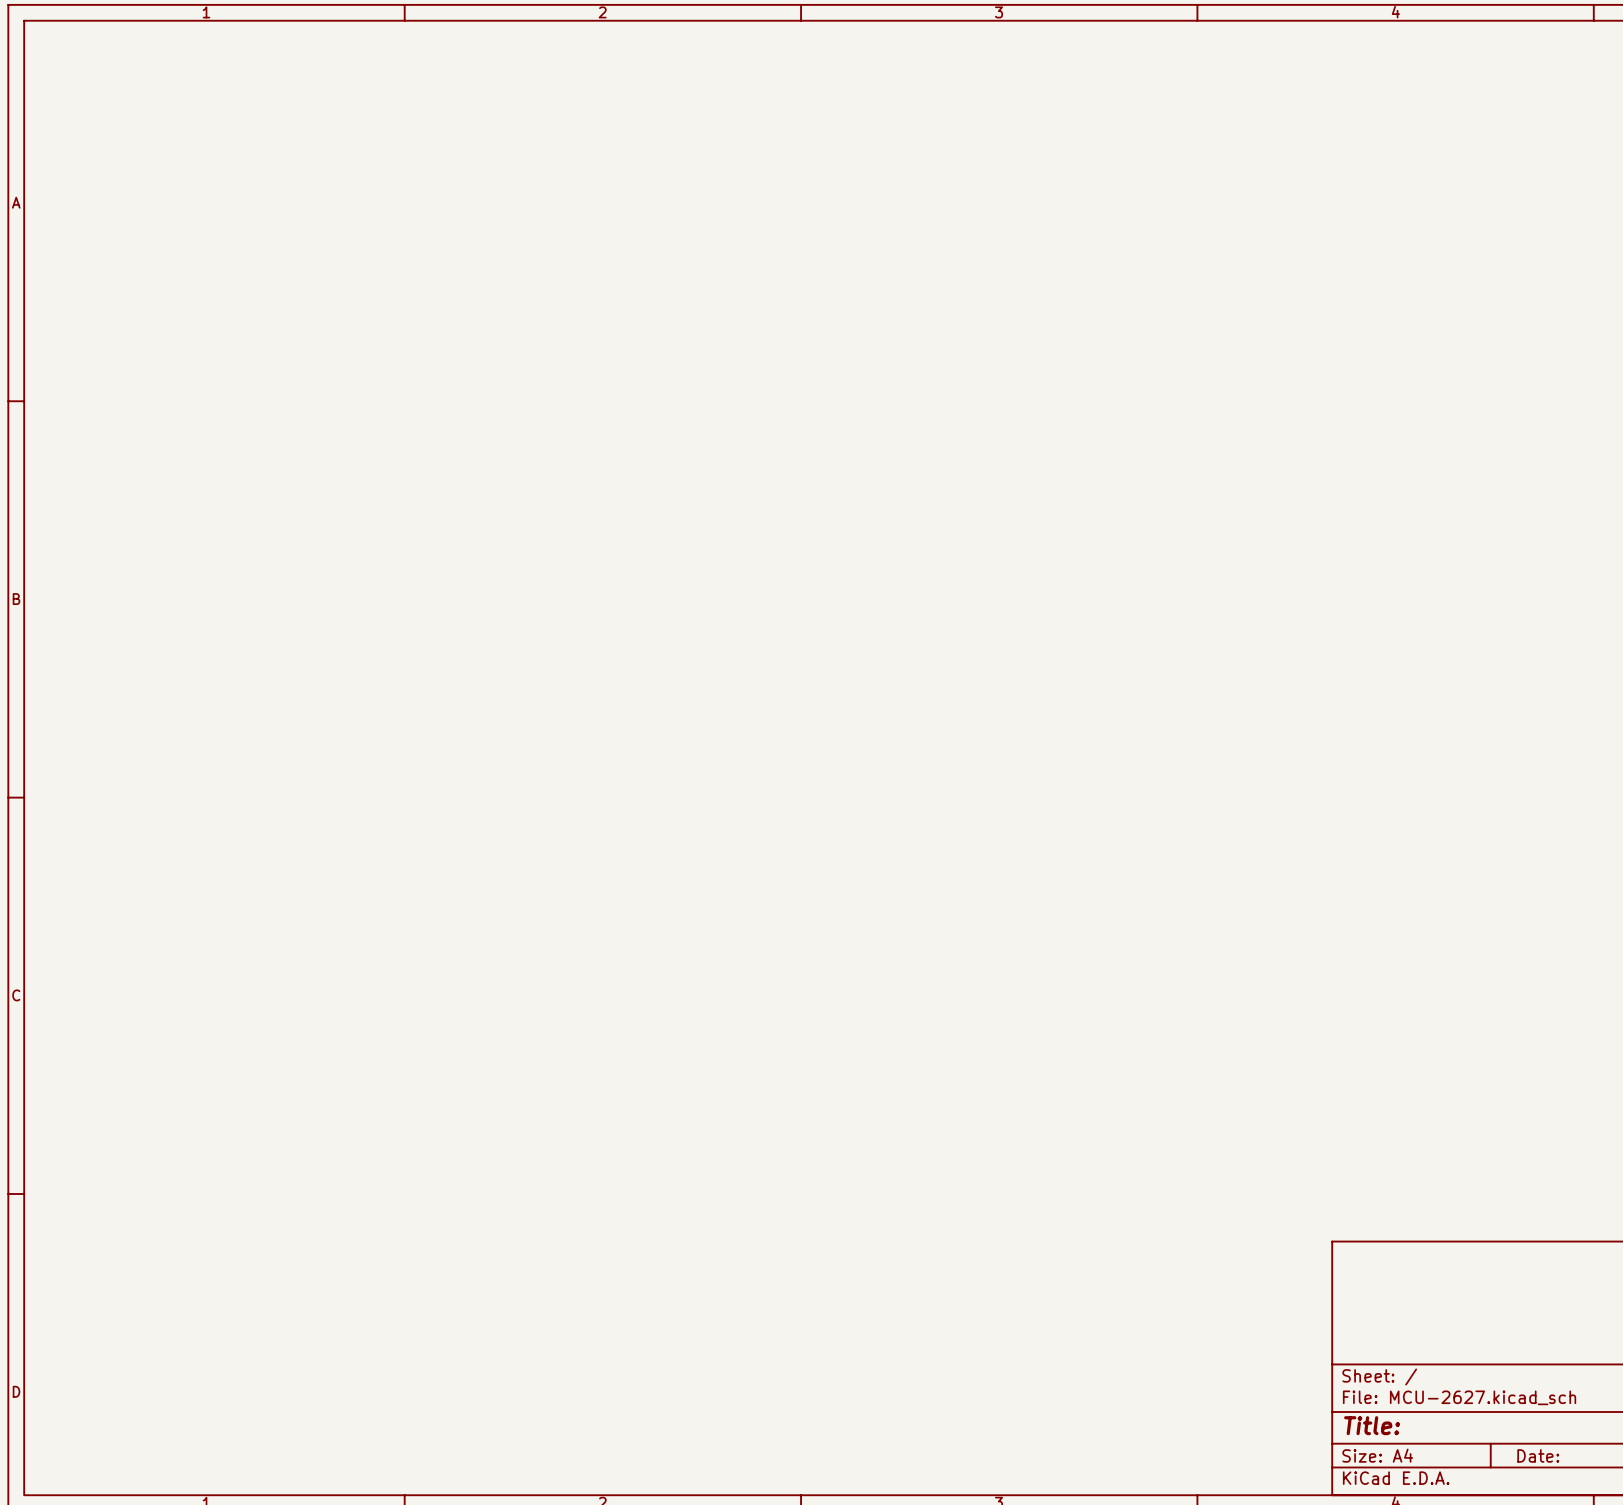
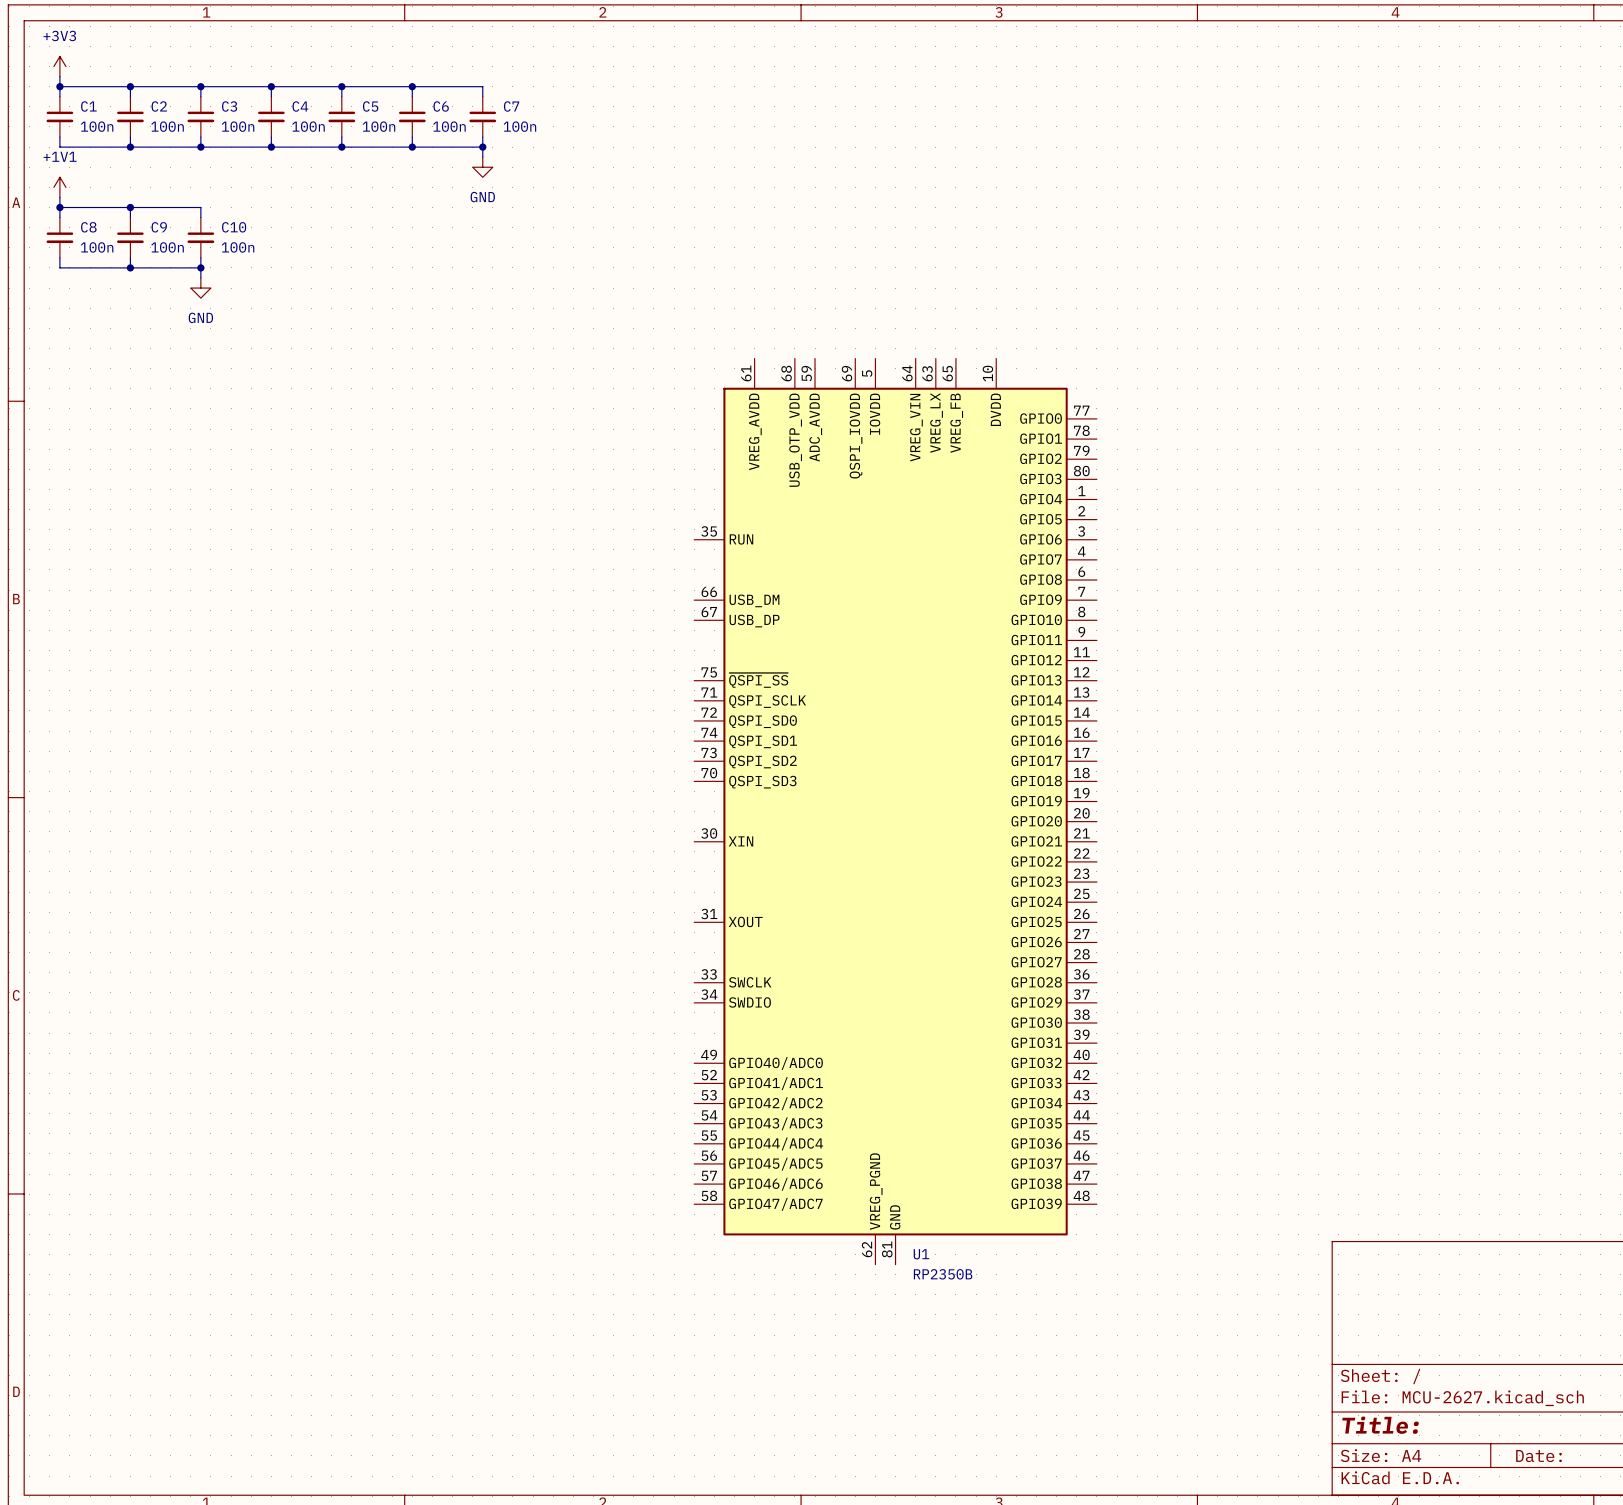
power symbol: none -> +3V3 (59, 66)
wire: none -> (59, 76) (59, 96)
wire: none -> (59, 86) (482, 86) (482, 96)
junction: none -> (59, 86)
wire: none -> (130, 86) (130, 96)
junction: none -> (130, 86)
wire: none -> (200, 86) (200, 96)
junction: none -> (200, 86)
wire: none -> (271, 86) (271, 96)
junction: none -> (271, 86)
wire: none -> (341, 86) (341, 96)
junction: none -> (341, 86)
wire: none -> (412, 86) (412, 96)
junction: none -> (412, 86)
C1: none -> 100n (59, 116)
C2: none -> 100n (130, 116)
C3: none -> 100n (200, 116)
C4: none -> 100n (271, 116)
C5: none -> 100n (341, 116)
C6: none -> 100n (412, 116)
C7: none -> 100n (482, 116)
wire: none -> (59, 137) (59, 147) (482, 147)
wire: none -> (130, 137) (130, 147)
wire: none -> (200, 137) (200, 147)
wire: none -> (271, 137) (271, 147)
wire: none -> (341, 137) (341, 147)
wire: none -> (412, 137) (412, 147)
wire: none -> (482, 137) (482, 157)
junction: none -> (130, 147)
junction: none -> (200, 147)
junction: none -> (271, 147)
junction: none -> (341, 147)
junction: none -> (412, 147)
junction: none -> (482, 147)
power symbol: none -> GND (482, 167)
power symbol: none -> +1V1 (59, 187)
wire: none -> (59, 197) (59, 217)
wire: none -> (59, 207) (200, 207) (200, 217)
junction: none -> (59, 207)
wire: none -> (130, 207) (130, 217)
junction: none -> (130, 207)
C8: none -> 100n (59, 237)
C9: none -> 100n (130, 237)
C10: none -> 100n (200, 237)
wire: none -> (59, 257) (59, 267) (200, 267)
wire: none -> (130, 257) (130, 267)
wire: none -> (200, 257) (200, 277)
junction: none -> (130, 267)
junction: none -> (200, 267)
power symbol: none -> GND (200, 288)
U1: none -> RP2350B (895, 811)

